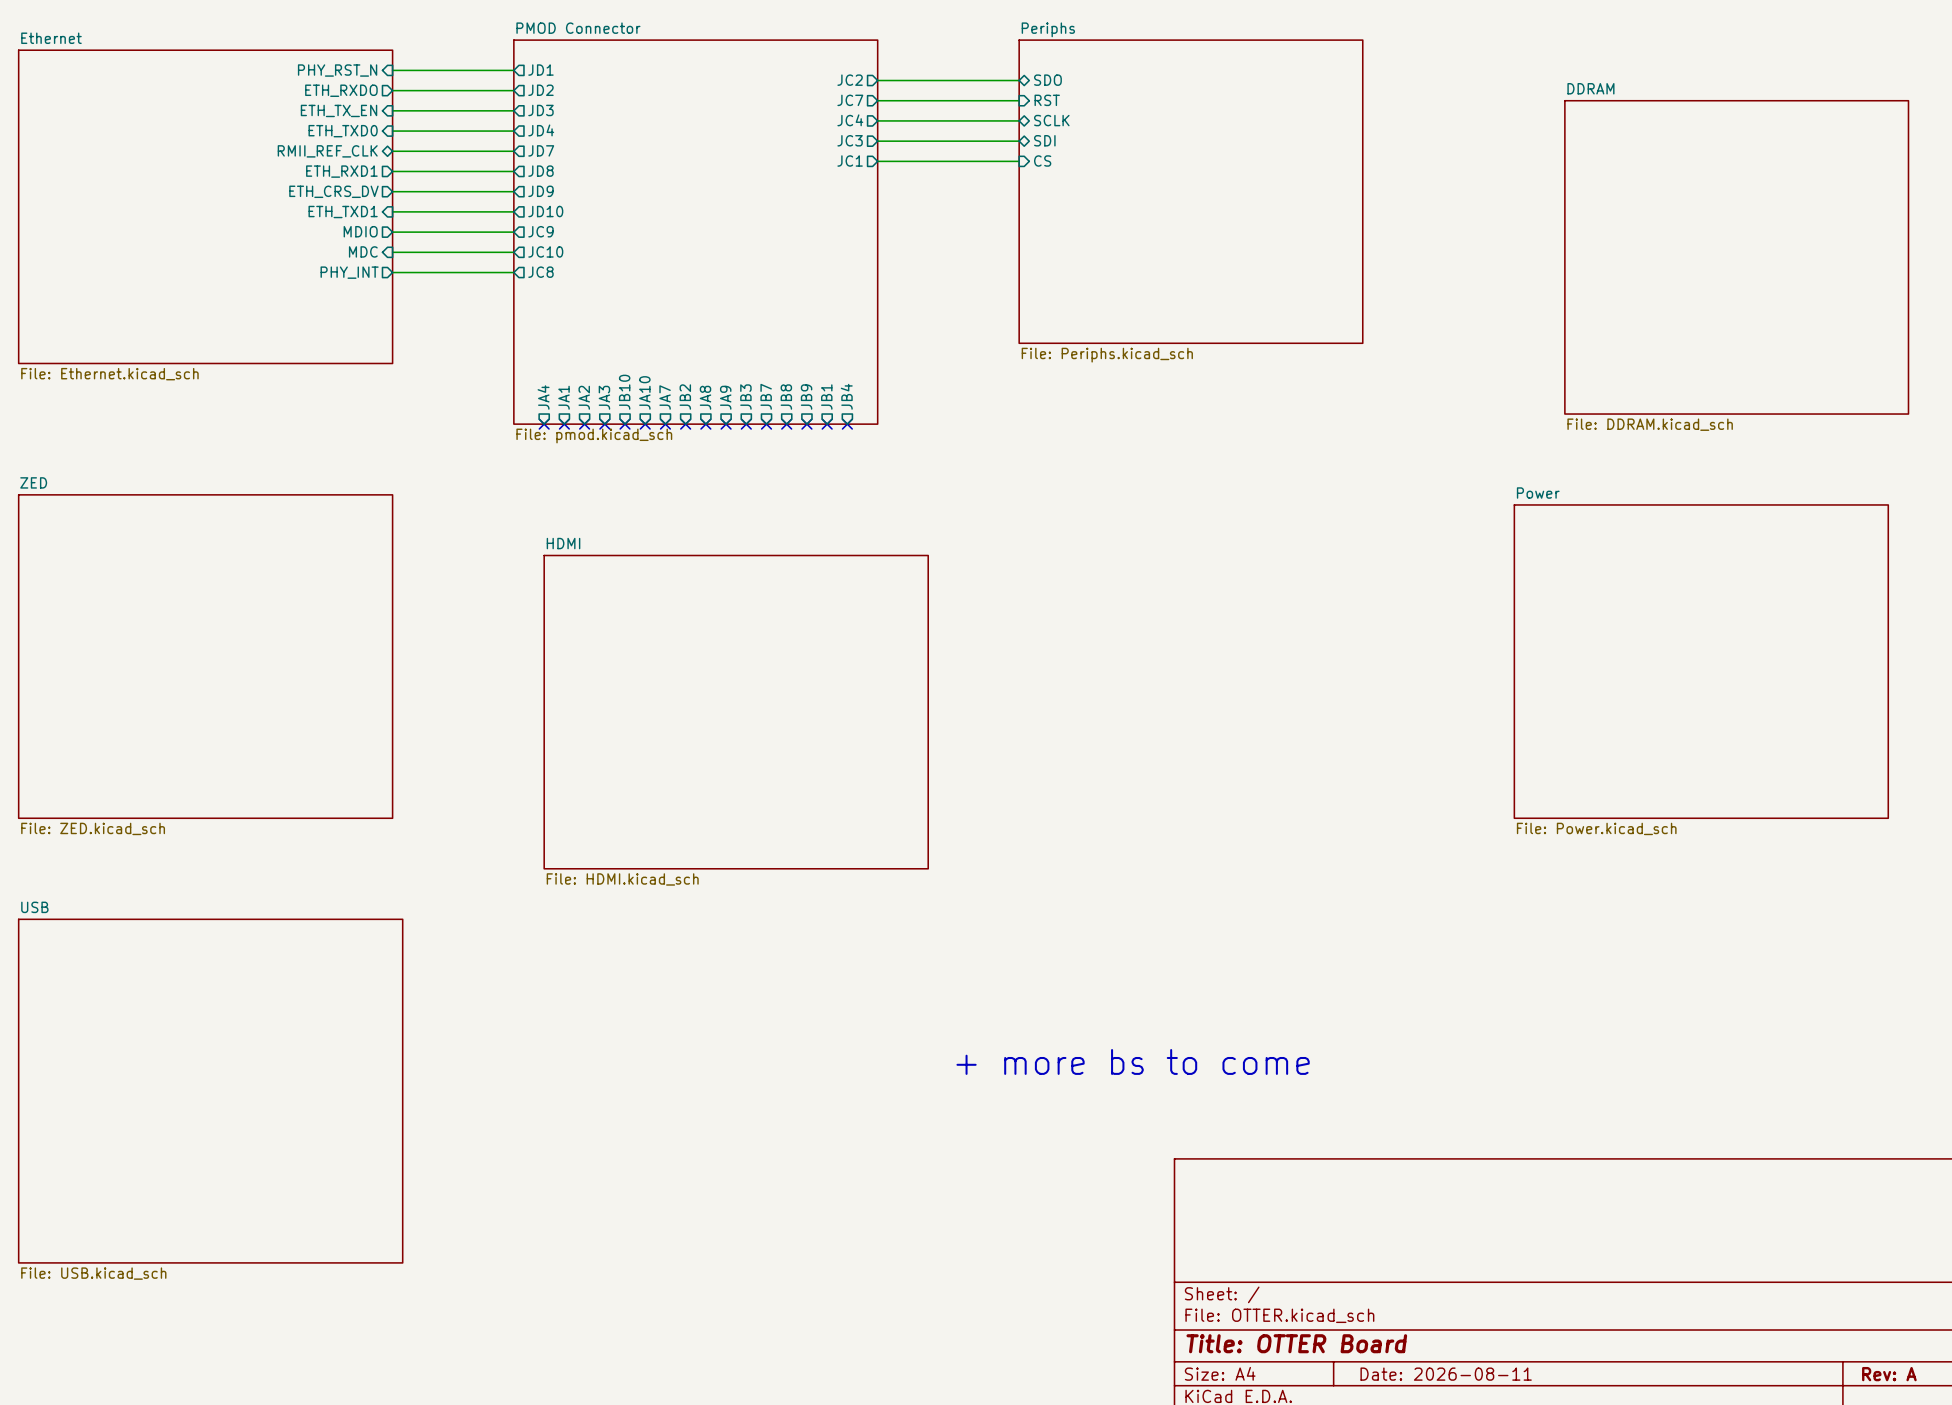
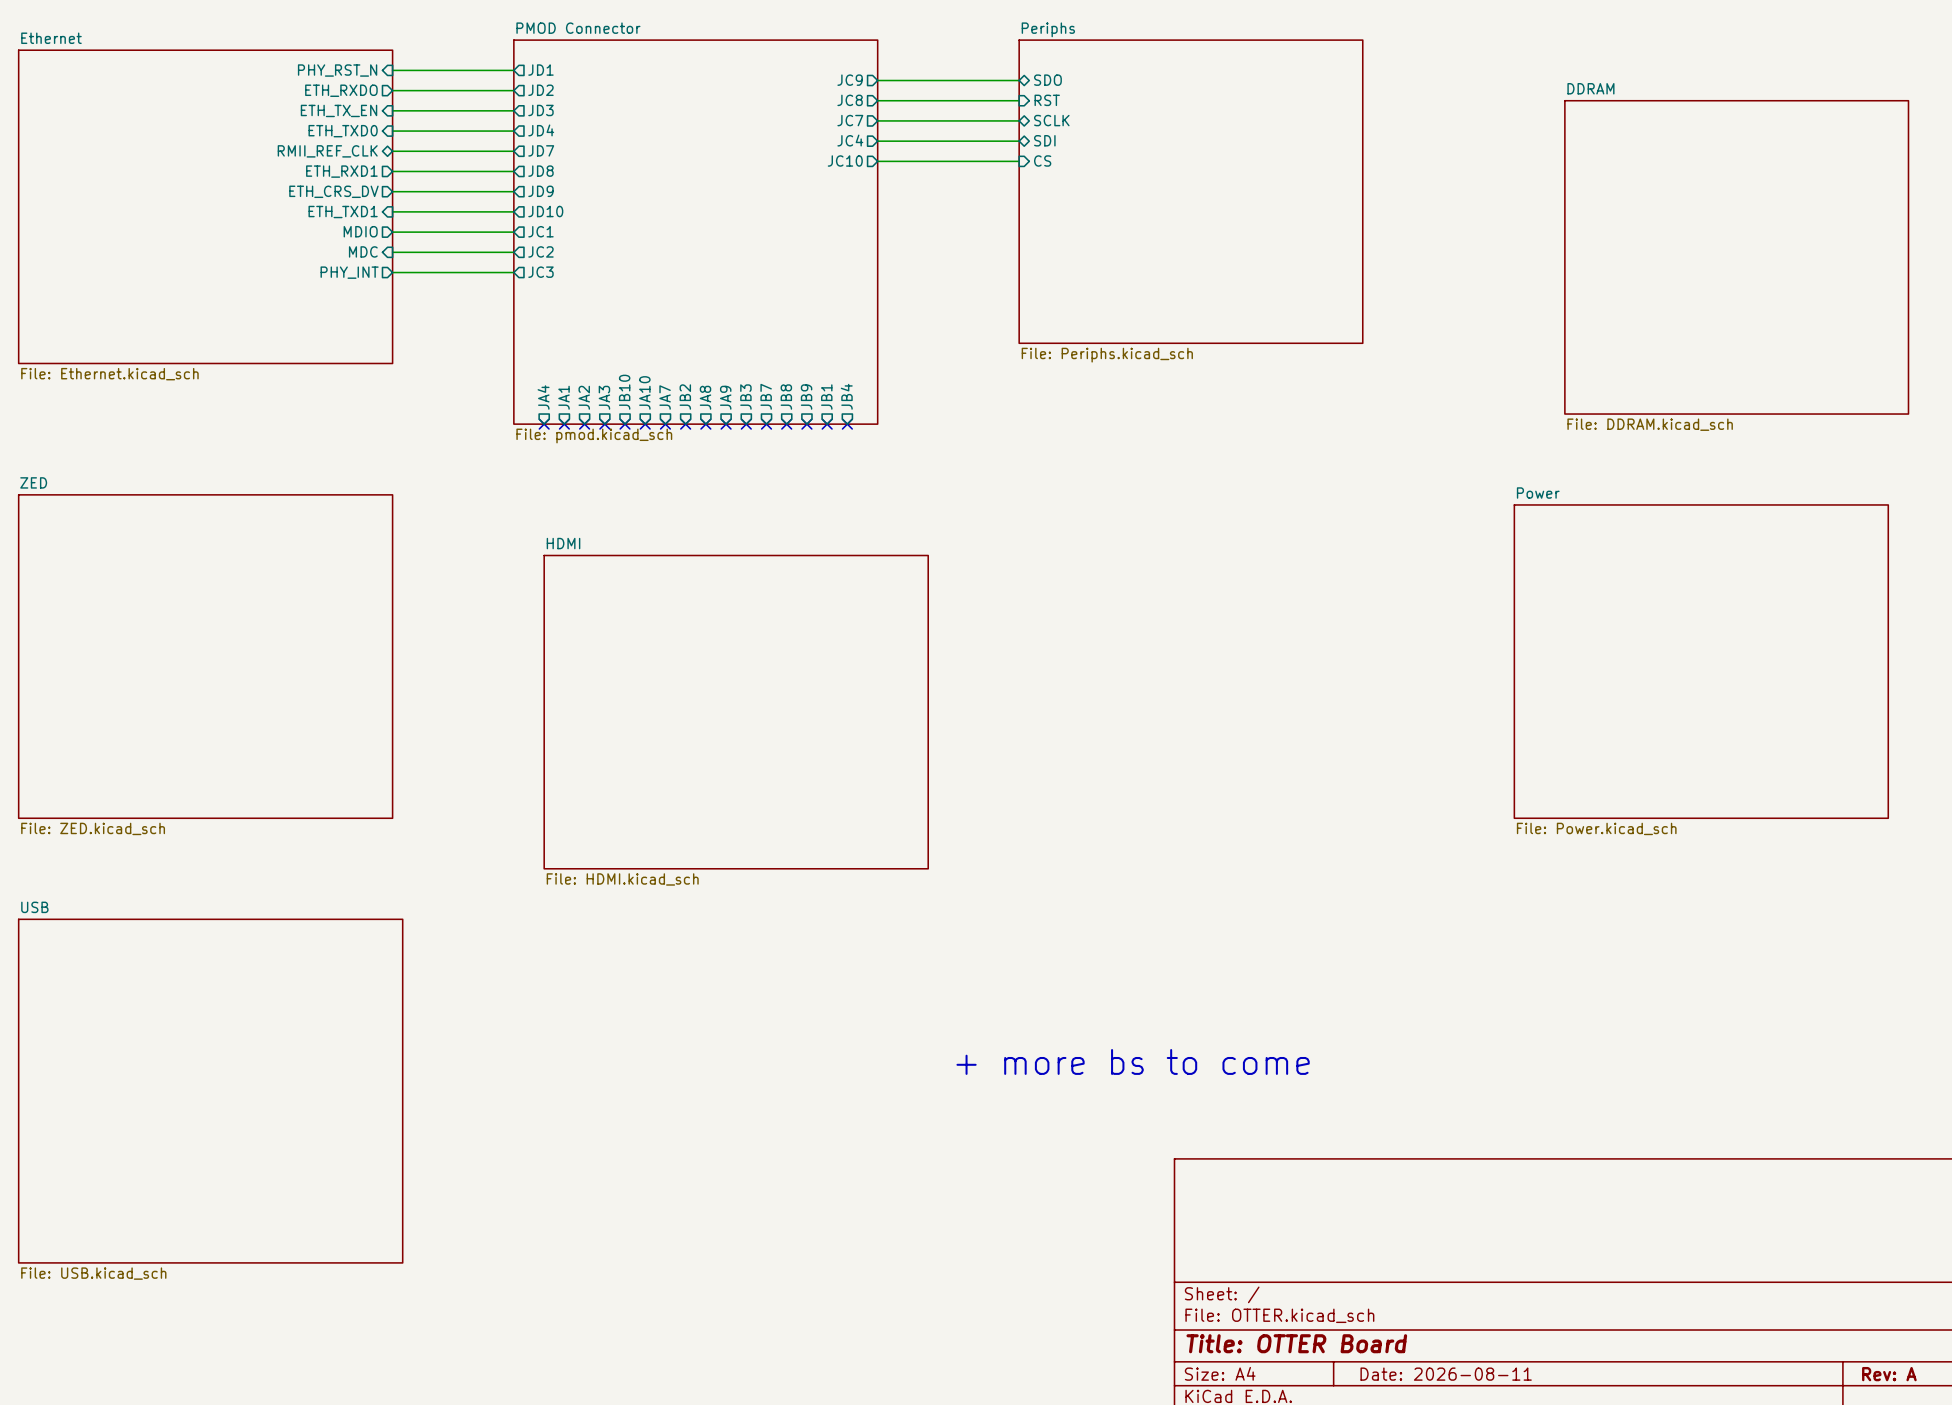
sheet pin: JC2 (850, 80) -> JC9 (850, 80)
sheet pin: JC7 (850, 100) -> JC8 (850, 100)
sheet pin: JC4 (850, 120) -> JC7 (850, 120)
sheet pin: JC3 (850, 140) -> JC4 (850, 140)
sheet pin: JC1 (850, 160) -> JC10 (845, 160)
sheet pin: JC9 (540, 231) -> JC1 (540, 231)
sheet pin: JC10 (545, 251) -> JC2 (540, 251)
sheet pin: JC8 (540, 272) -> JC3 (540, 272)

